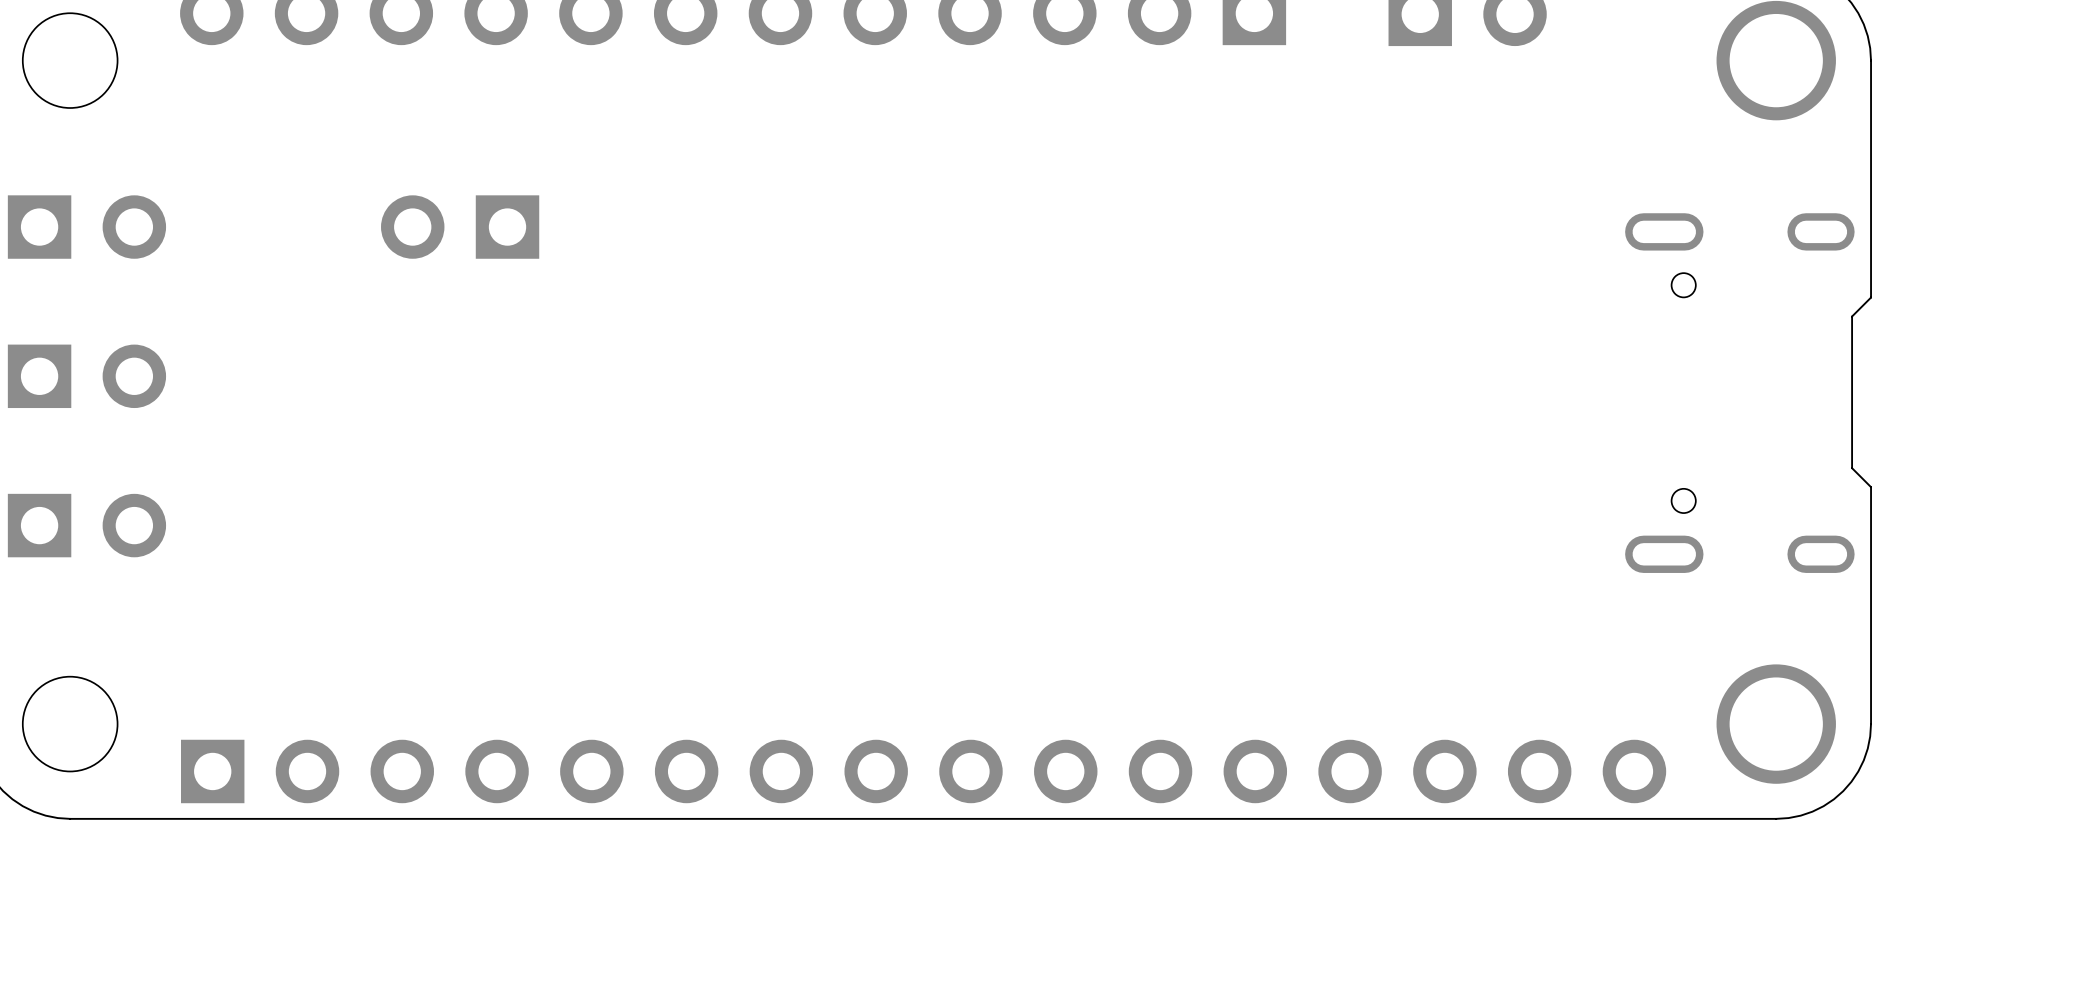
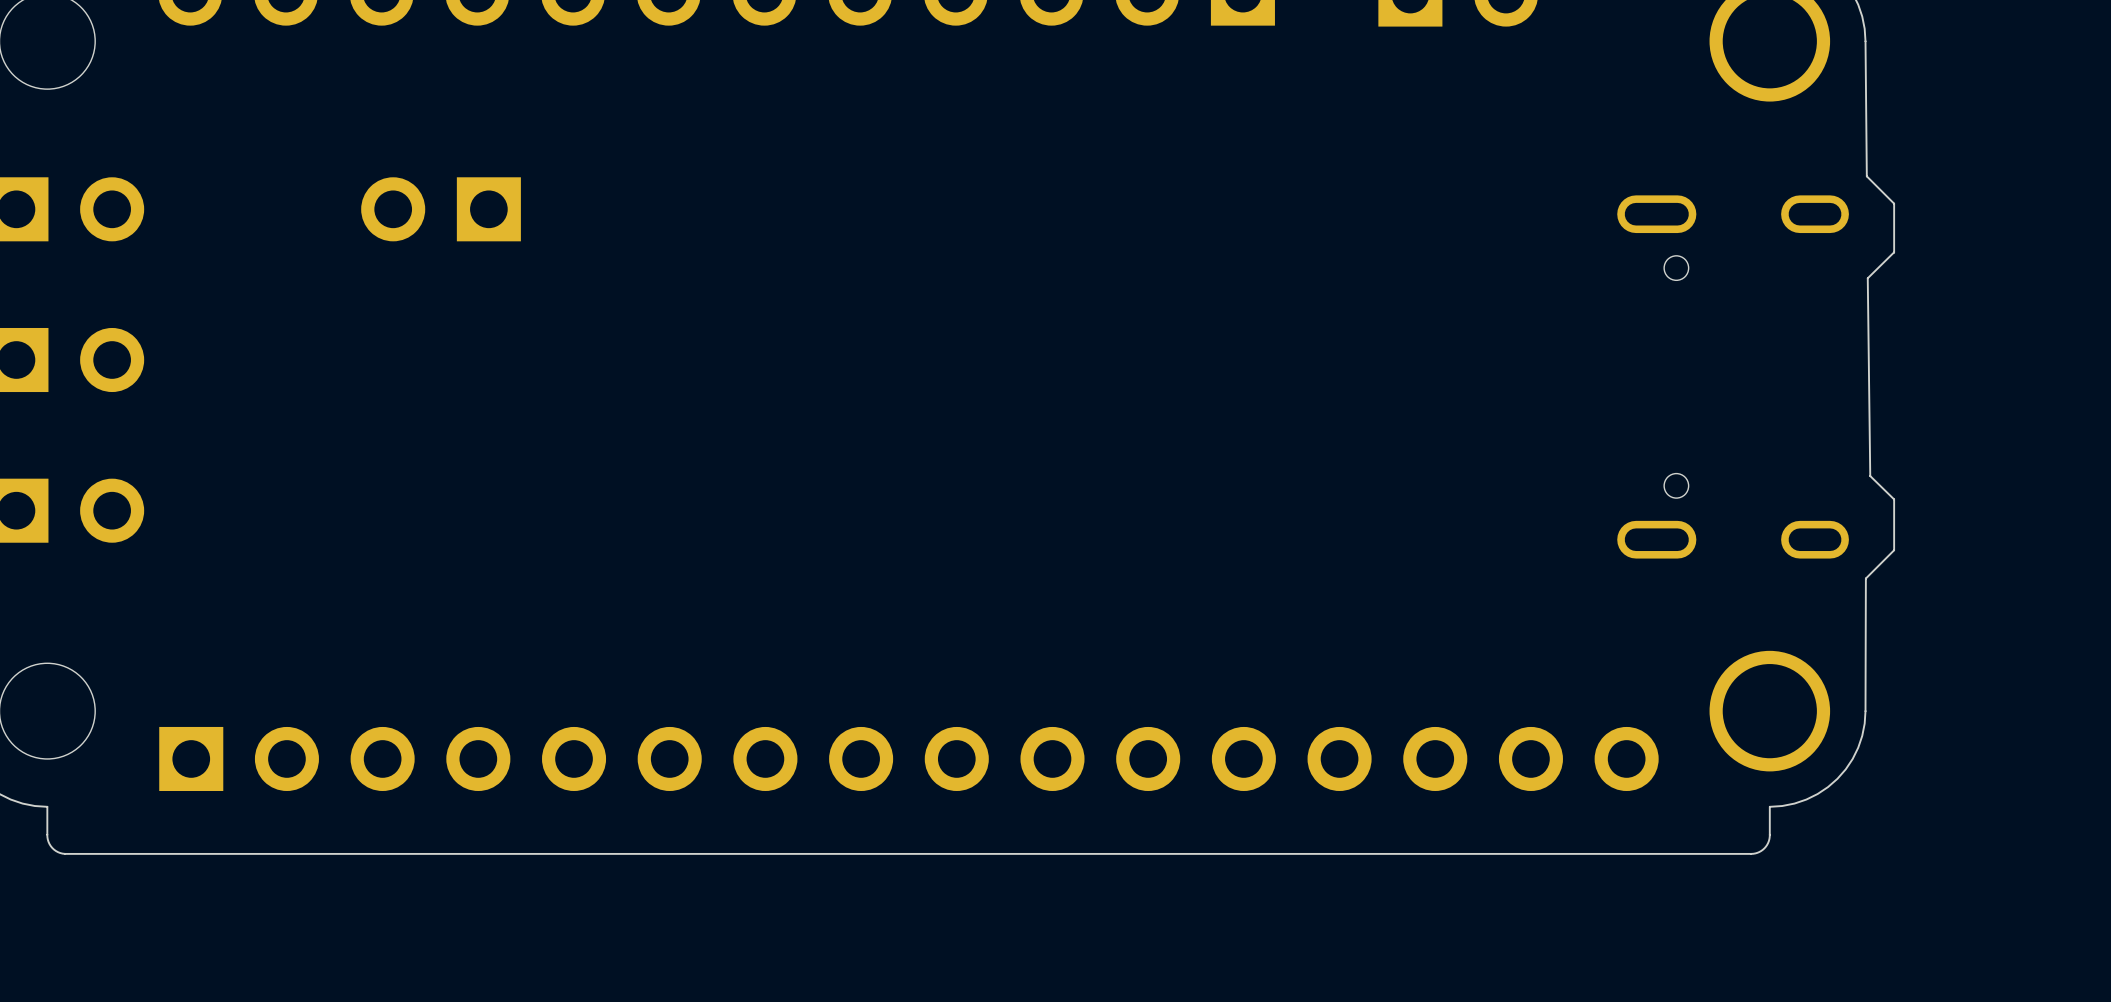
board edge: (1871, 60) (1871, 297) (1852, 316) (1852, 468) (1871, 487) (1871, 724) -> (1893, 252) (1867, 278) (1870, 476) (1894, 499) (1894, 550) (1865, 578) (1865, 711)
board edge: none -> (1865, 41) (1866, 176) (1894, 203) (1894, 252)
board edge: (1776, 818) (70, 818) -> (1751, 853) (65, 853) (55, 851) (48, 841) (47, 806)
board edge: none -> (1769, 806) (1768, 842) (1761, 850) (1751, 853)

